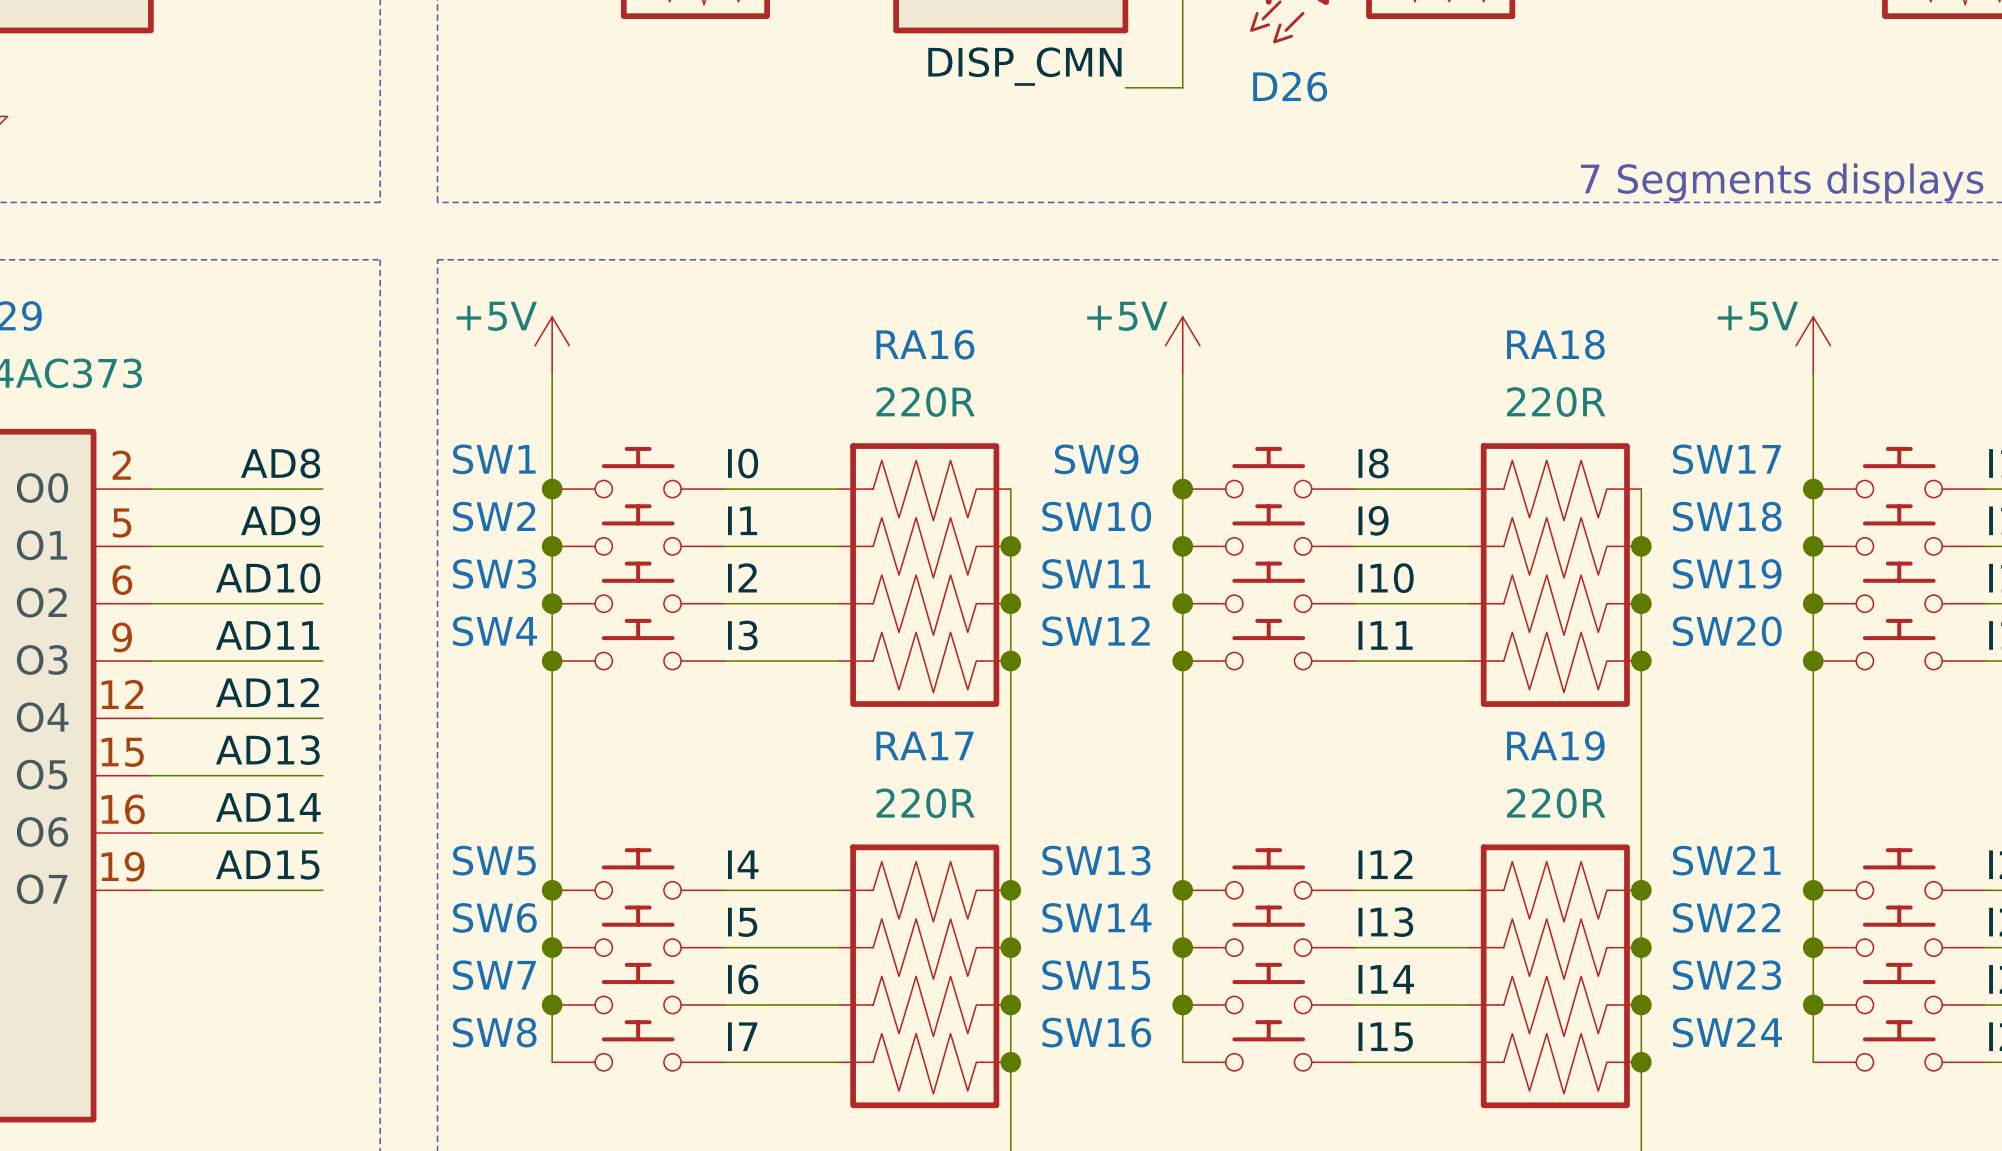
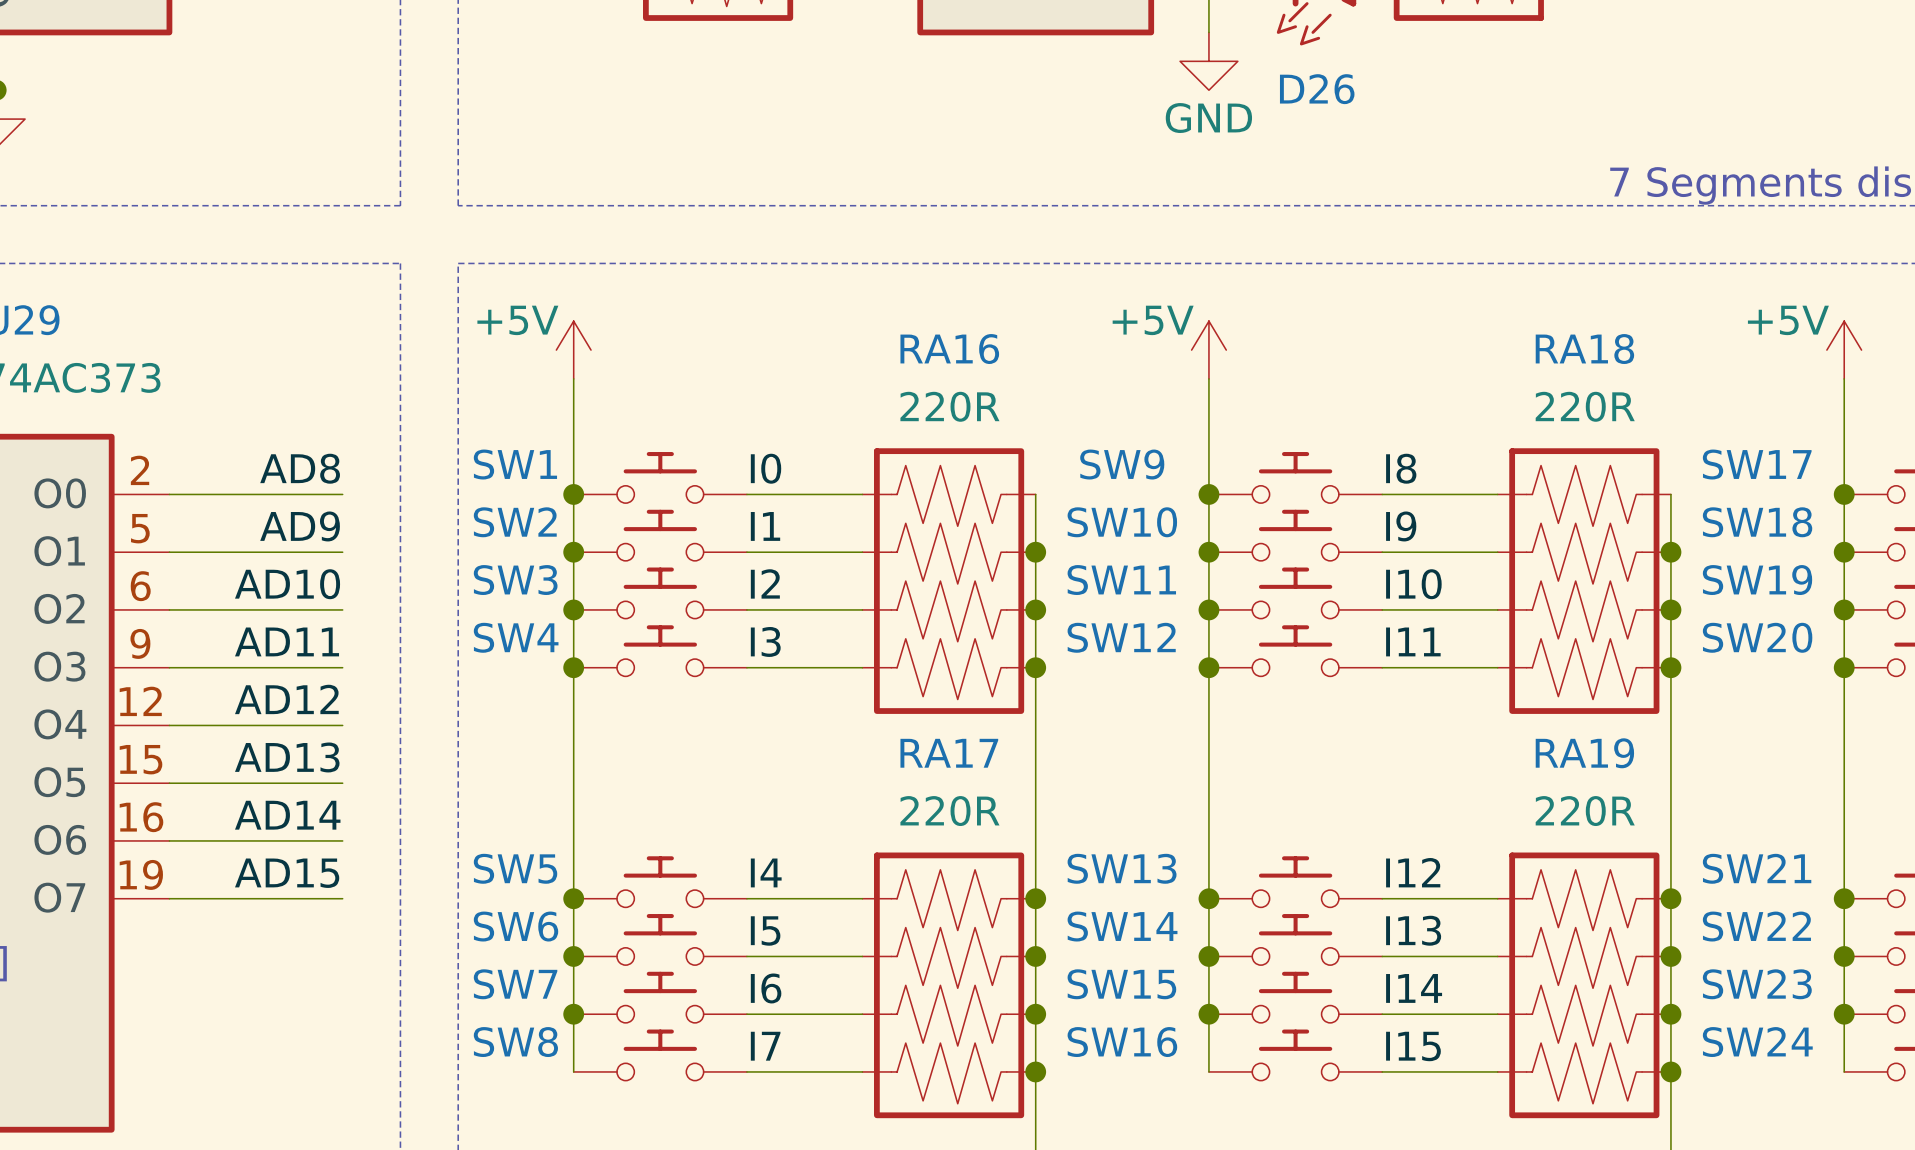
wire: (1182, 30) (1182, 87) (1125, 87) -> none
power symbol: none -> GND (1208, 61)
label: DISP_CMN (1024, 66) -> none

